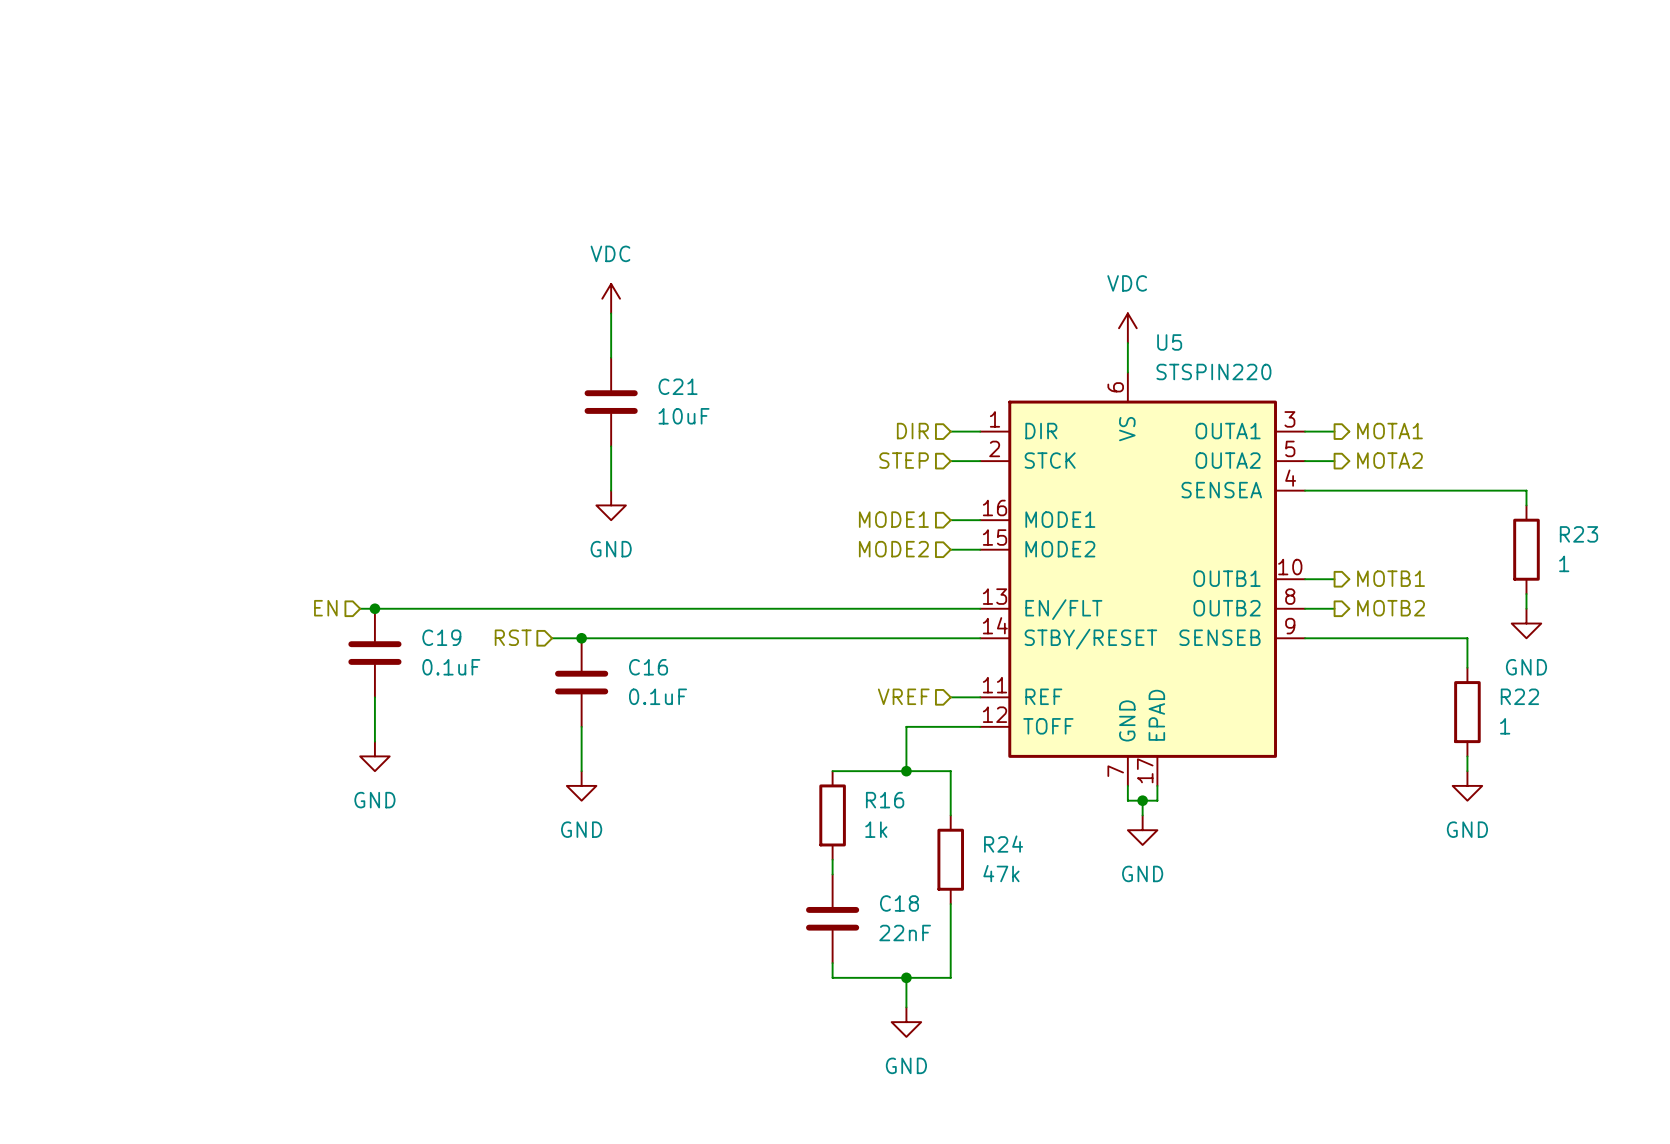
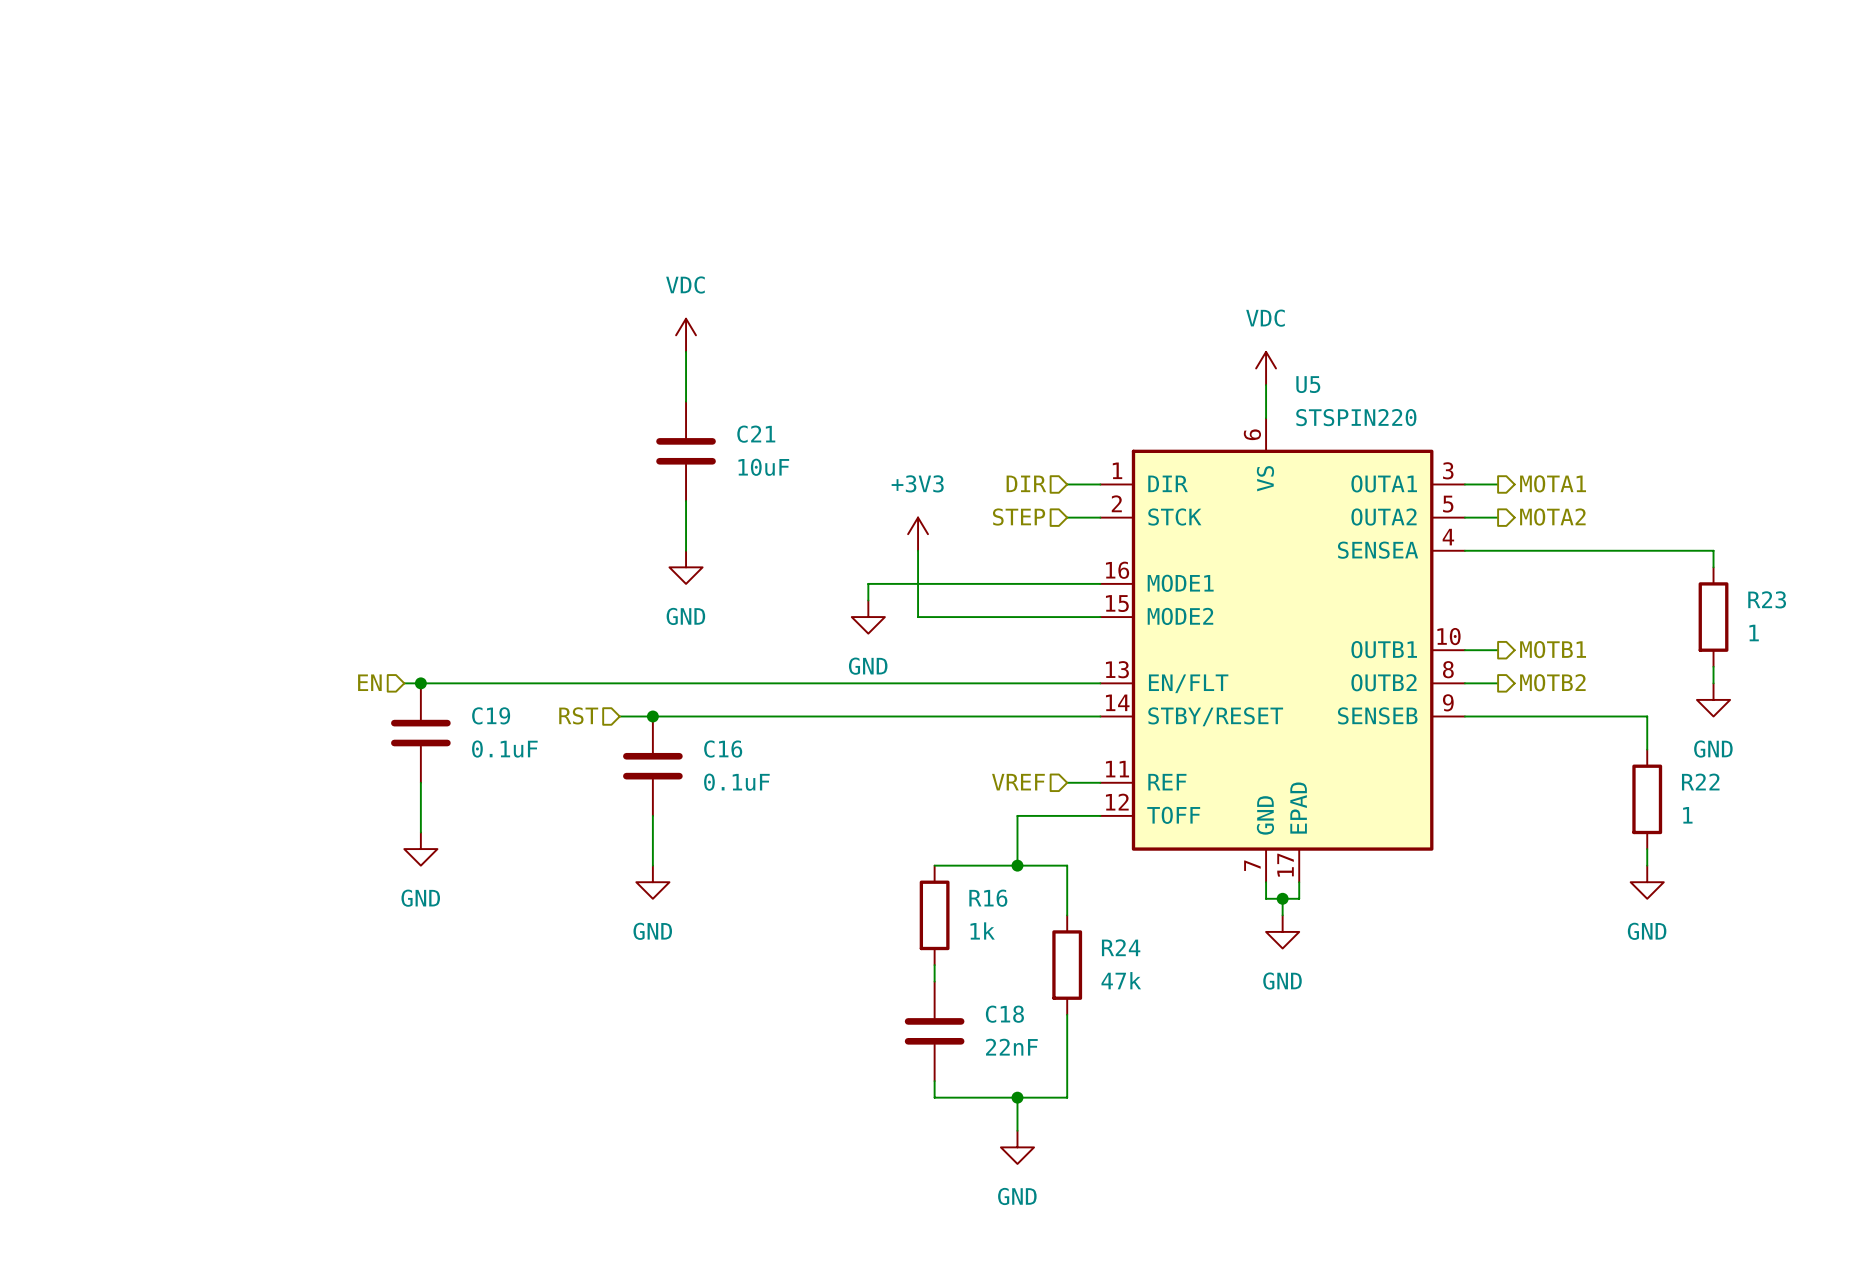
power symbol: none -> +3V3 (918, 534)
wire: none -> (918, 550) (918, 617) (1067, 617)
hierarchical label: MODE1 (893, 519) -> none
wire: none -> (1067, 583) (868, 583) (868, 600)
power symbol: none -> GND (868, 617)
hierarchical label: MODE2 (893, 549) -> none

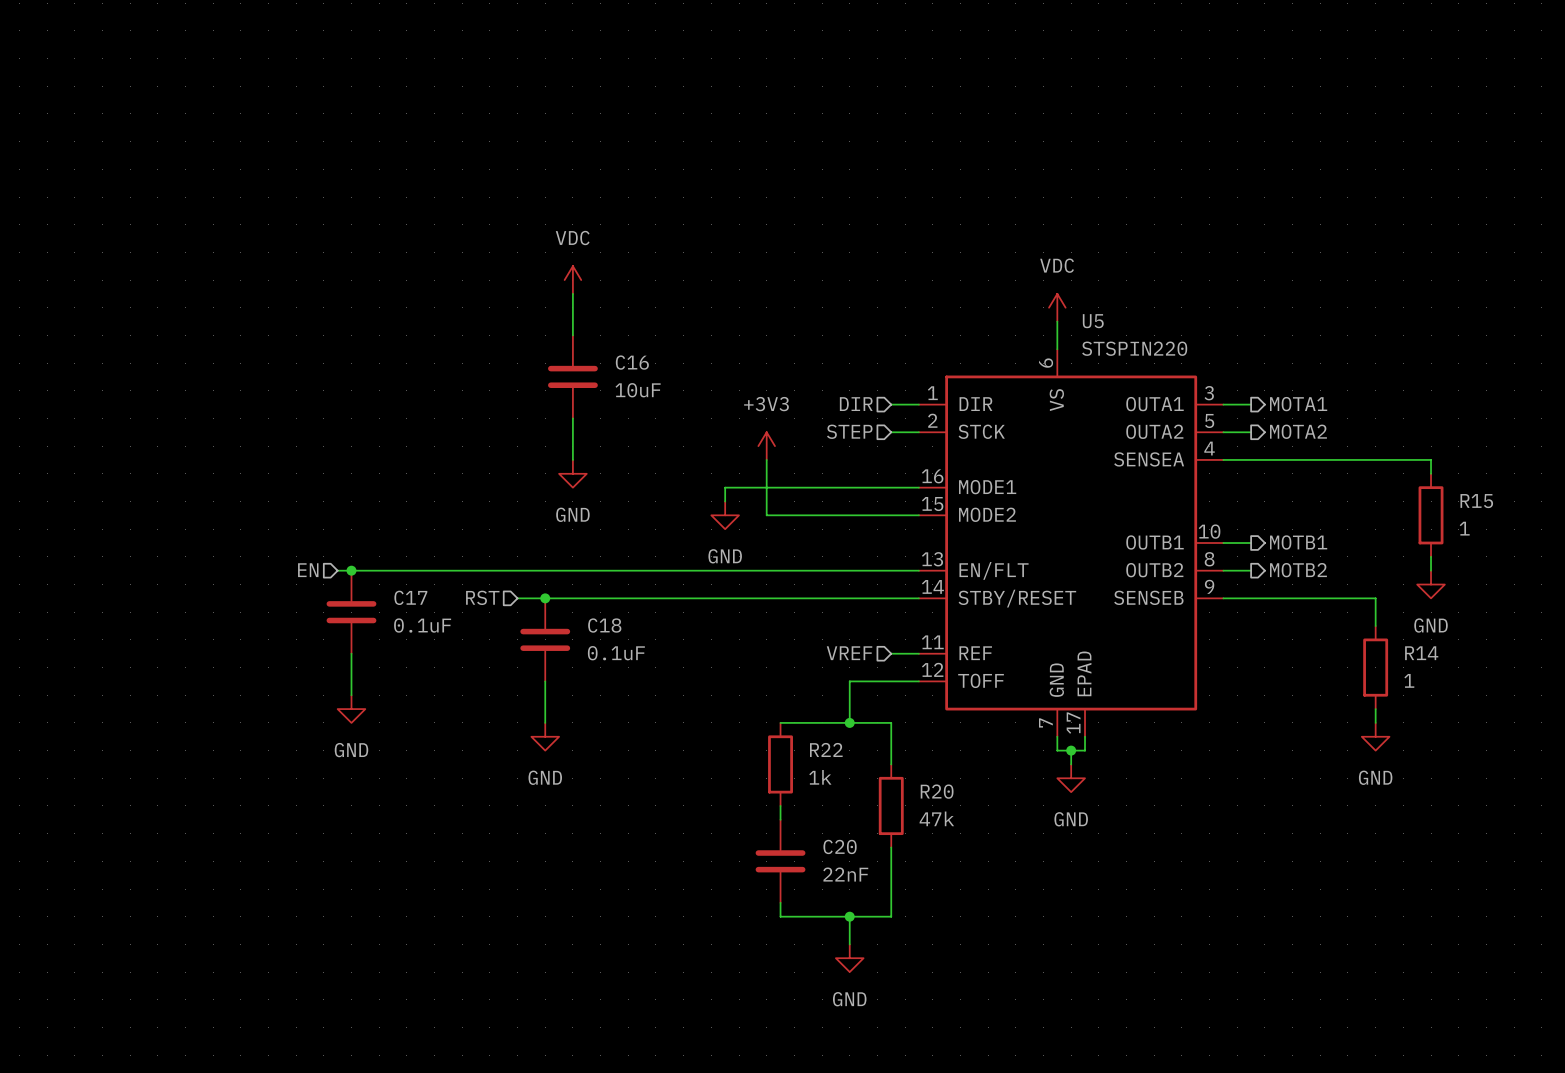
C21 name: C21 (756, 434) -> C16 (632, 362)
R23 name: R23 (1767, 599) -> R15 (1476, 501)
C19 name: C19 (491, 715) -> C17 (410, 597)
C16 name: C16 (723, 749) -> C18 (604, 625)
R22 name: R22 (1700, 782) -> R14 (1421, 653)
R16 name: R16 (988, 898) -> R22 (826, 749)
R24 name: R24 (1121, 947) -> R20 (937, 791)
C18 name: C18 (1004, 1014) -> C20 (840, 846)

